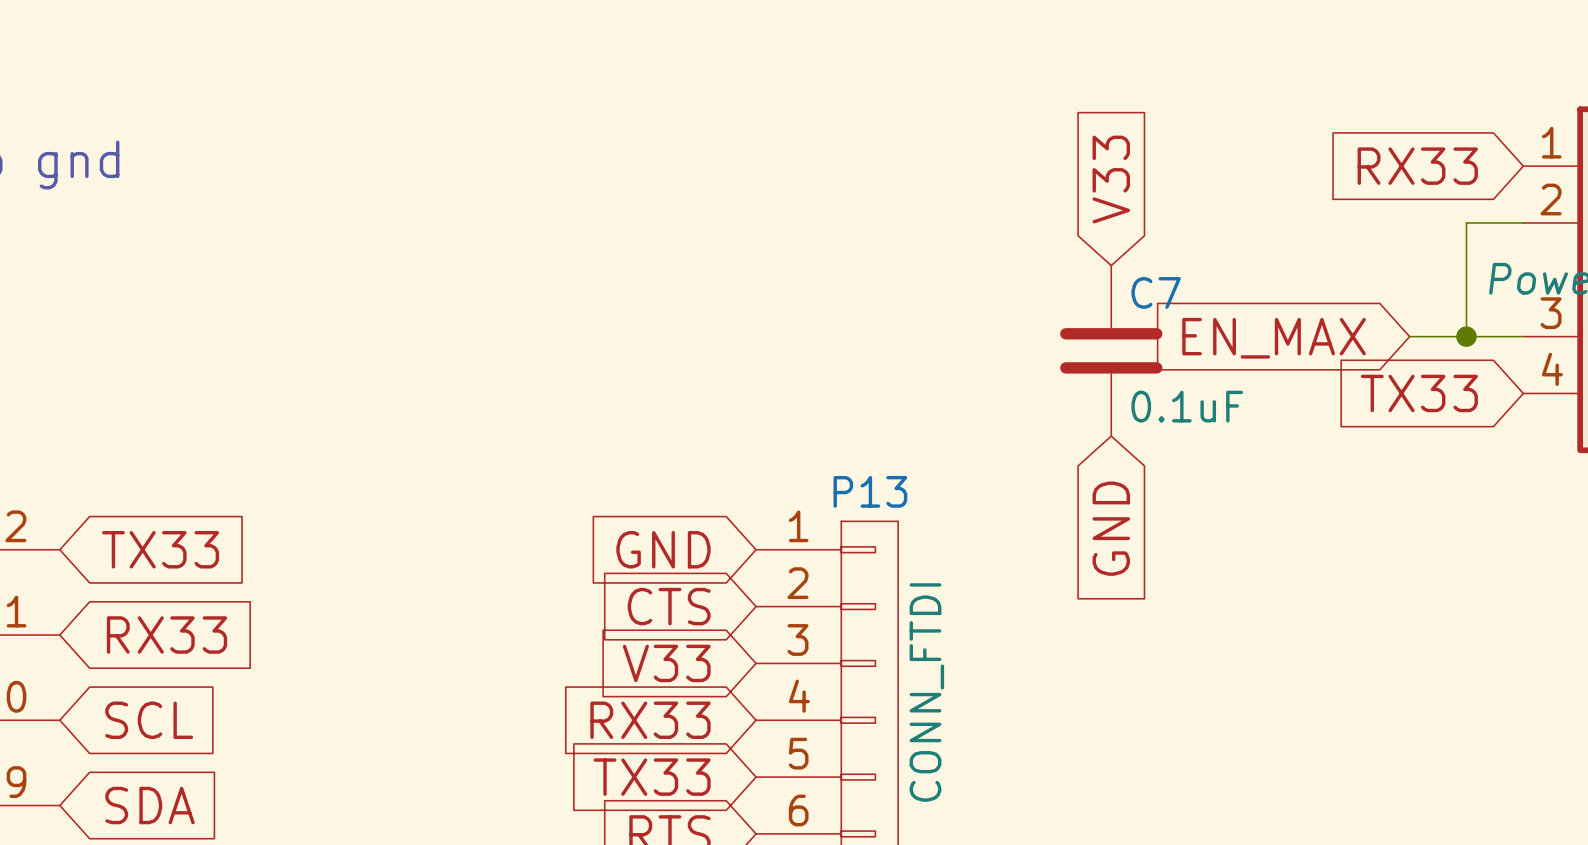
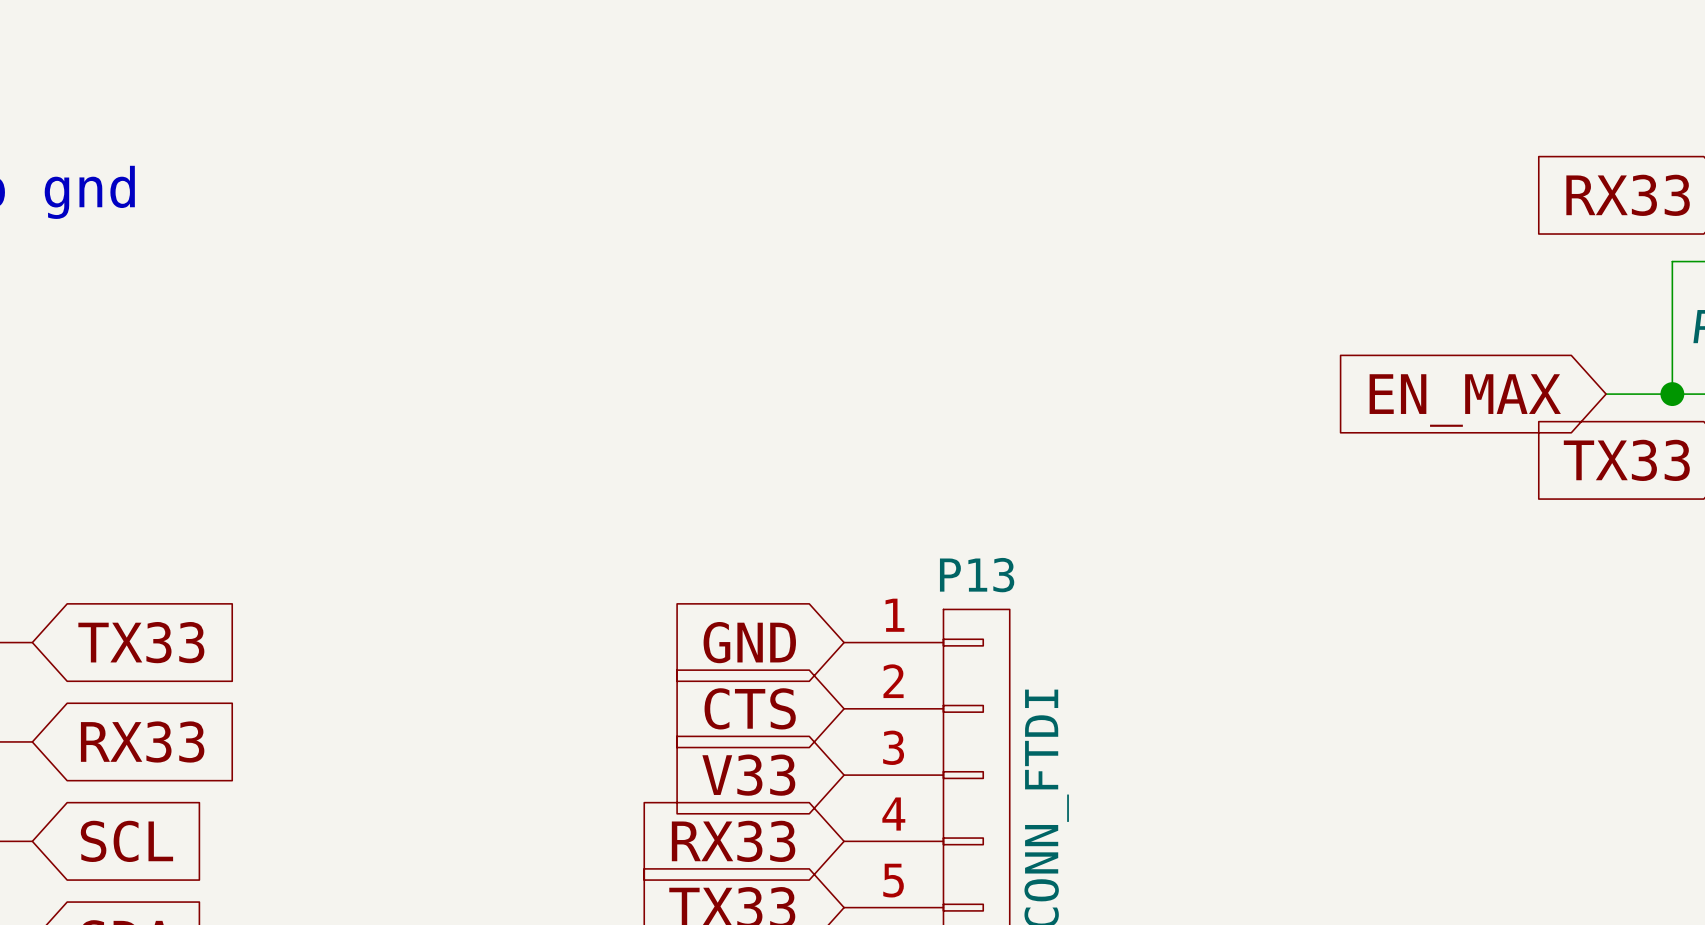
global label: V33 (1111, 179) -> none
C7: 0.1uF (1111, 350) -> none
global label: GND (1111, 528) -> none

